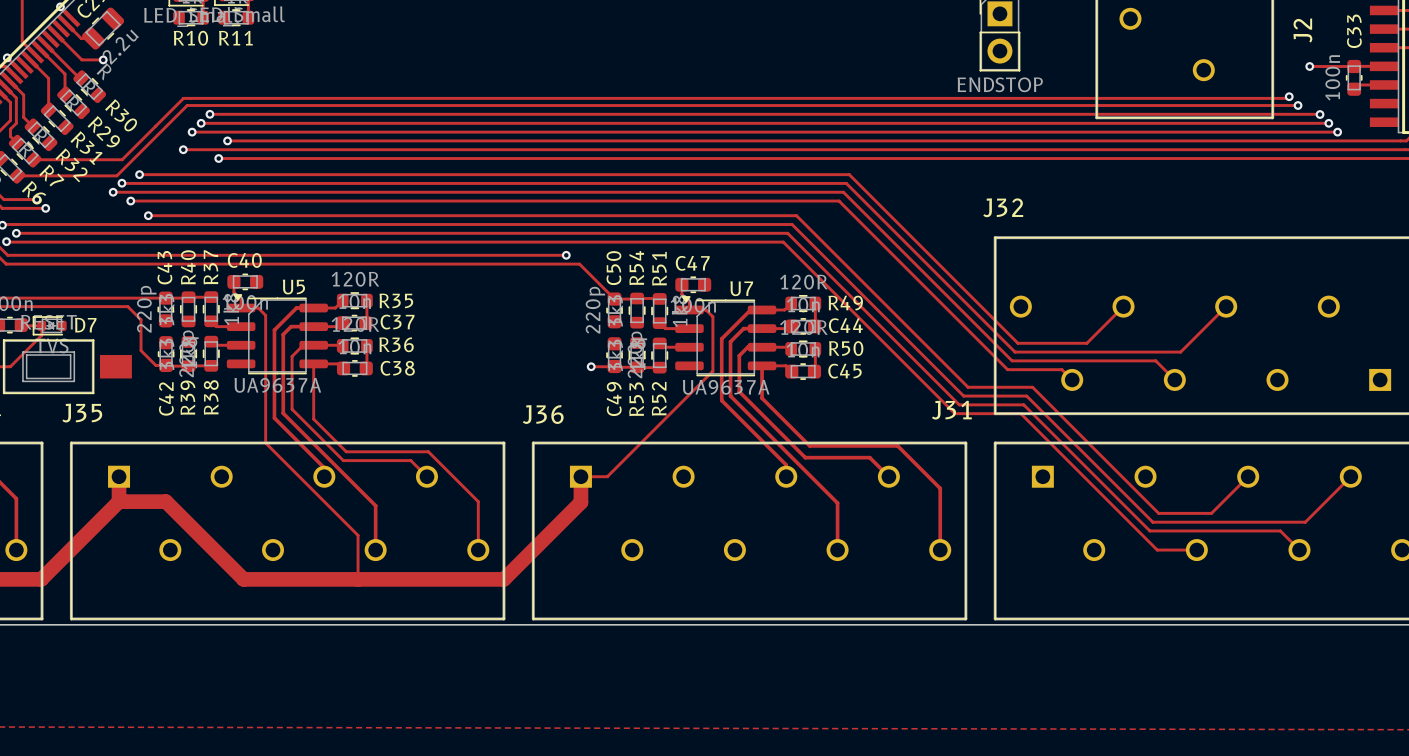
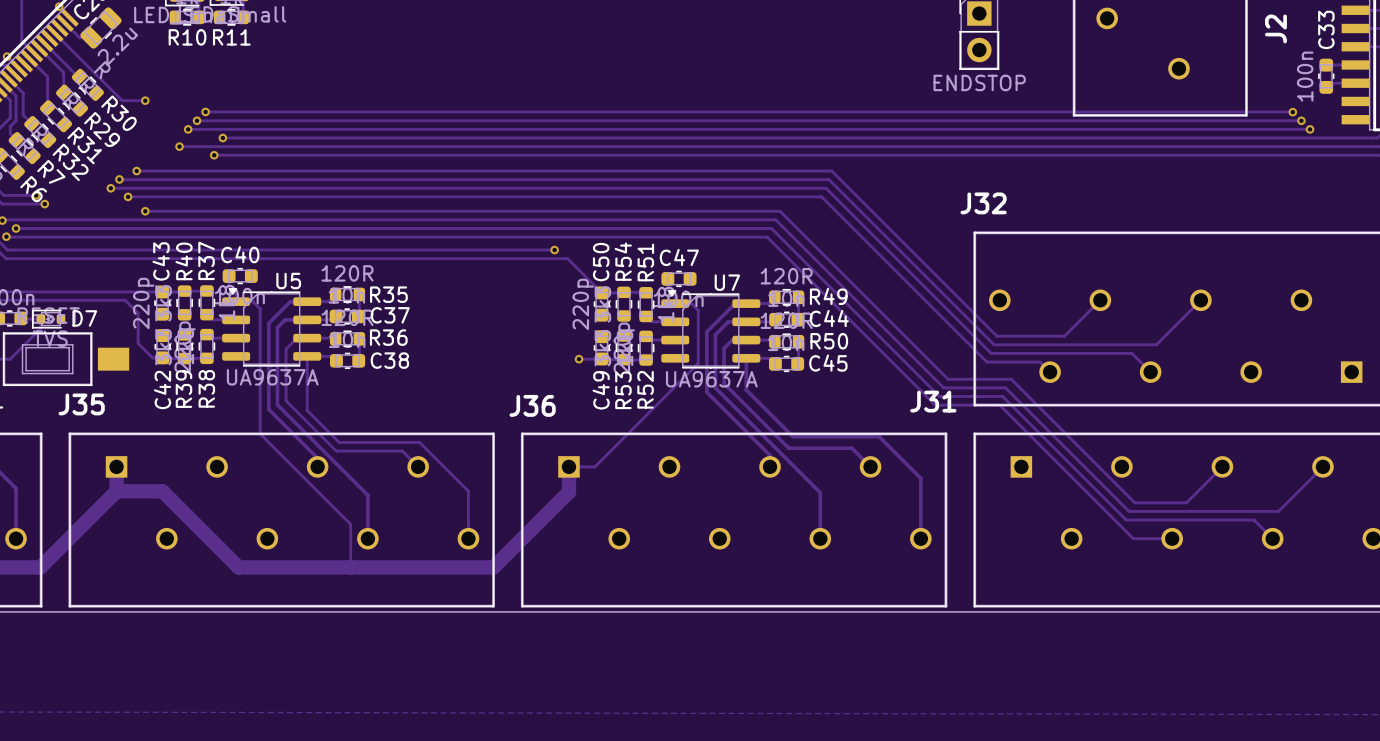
track: (81, 59) (103, 59) -> (80, 58) (122, 100) (145, 100)
via position: (103, 59) -> (145, 100)
track: (1309, 66) (1354, 66) -> none
via: (1309, 66) -> none
track: (1289, 96) (1287, 98) (183, 98) (122, 159) (33, 159) -> none
via: (1289, 96) -> none
track: (1298, 105) (187, 105) (116, 175) (17, 175) -> none
via: (1298, 105) -> none

